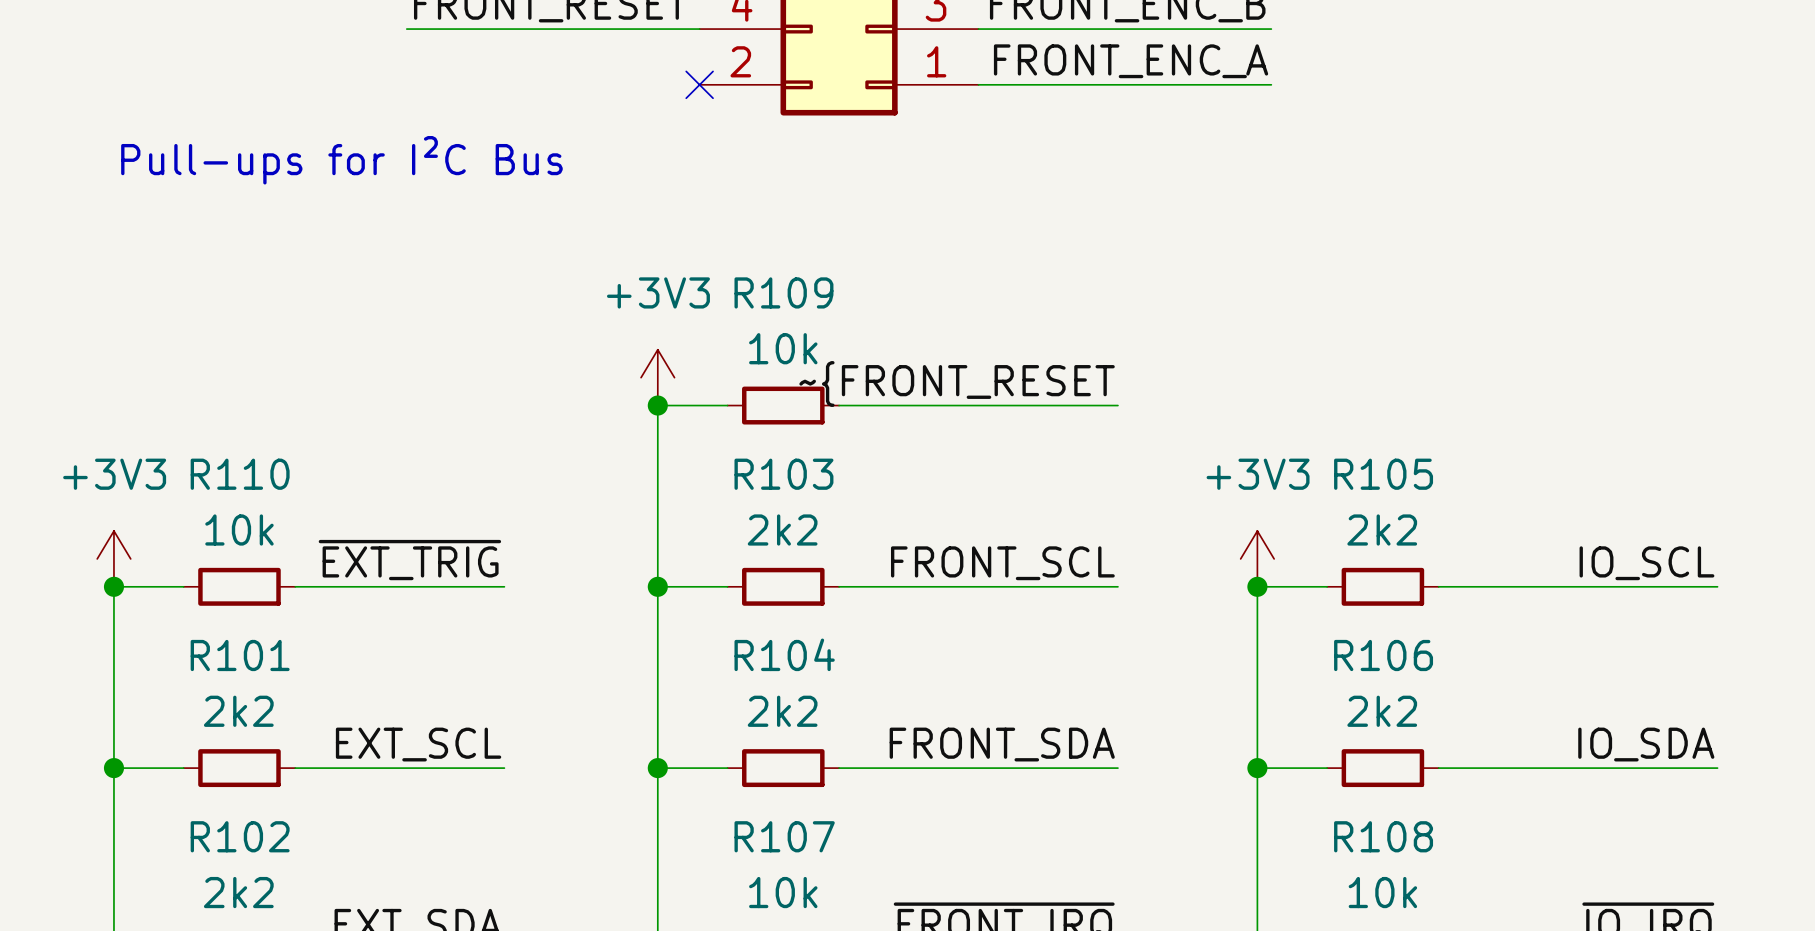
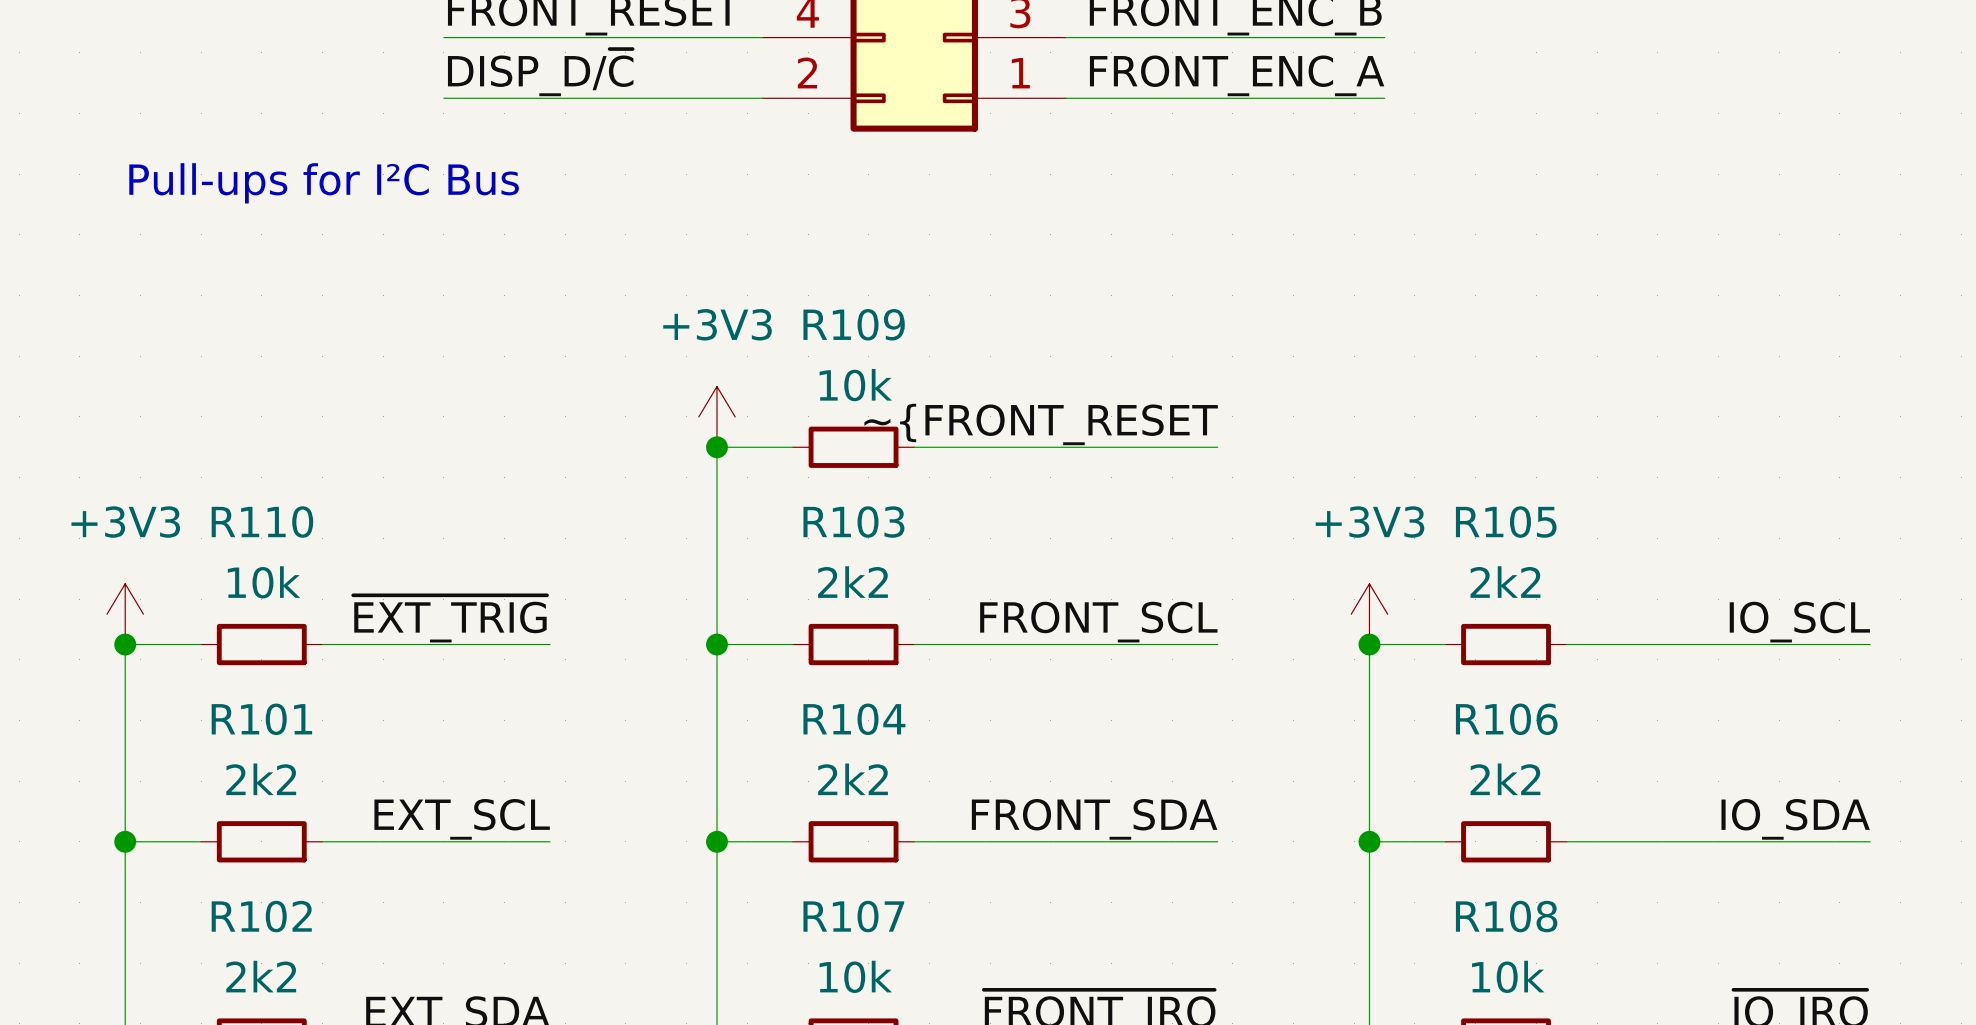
label: none -> DISP_D/~{C} (540, 72)
wire: none -> (443, 98) (762, 98)
no-connect mark: (699, 84) -> none

